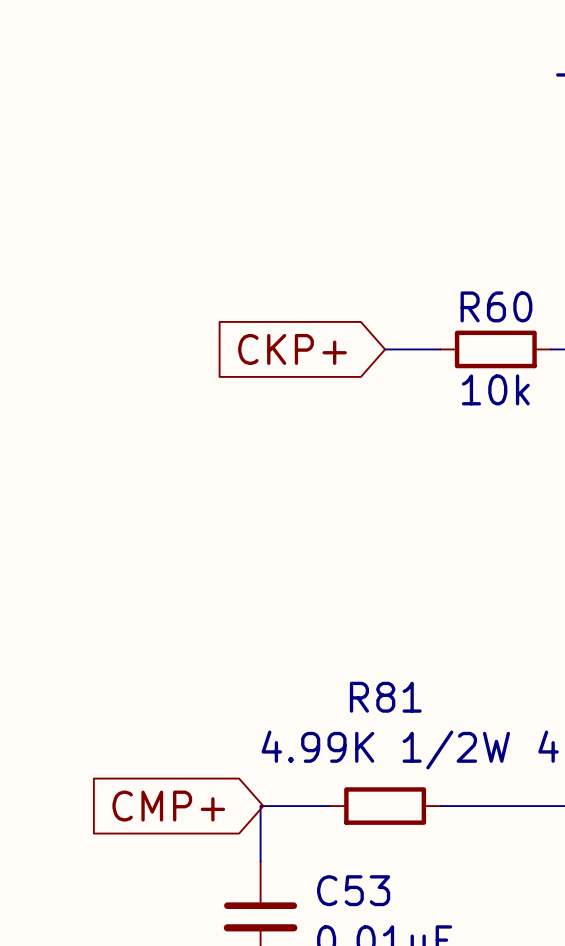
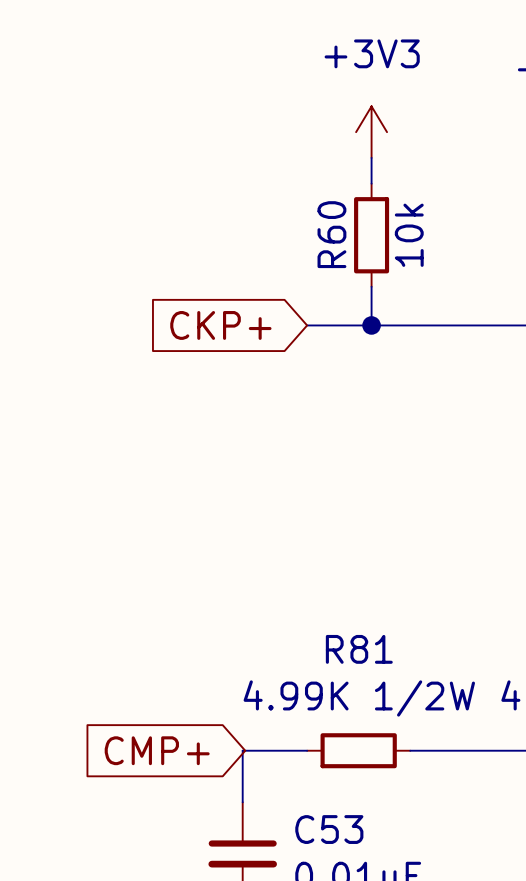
power symbol: none -> +3V3 (371, 132)
wire: none -> (371, 157) (371, 183)
R60 name position: R60 (496, 306) -> R60 (331, 234)
wire: none -> (371, 286) (371, 325)
global label position: CKP+ (292, 349) -> CKP+ (220, 325)
wire: none -> (307, 325) (358, 325)
junction: none -> (371, 325)
wire: none -> (410, 325) (513, 325)
R60 rotation: 0° (495, 349) -> 90° clockwise (371, 235)
R60 position: (495, 349) -> (371, 235)
R60 value position: 10k (495, 389) -> 10k (409, 235)

